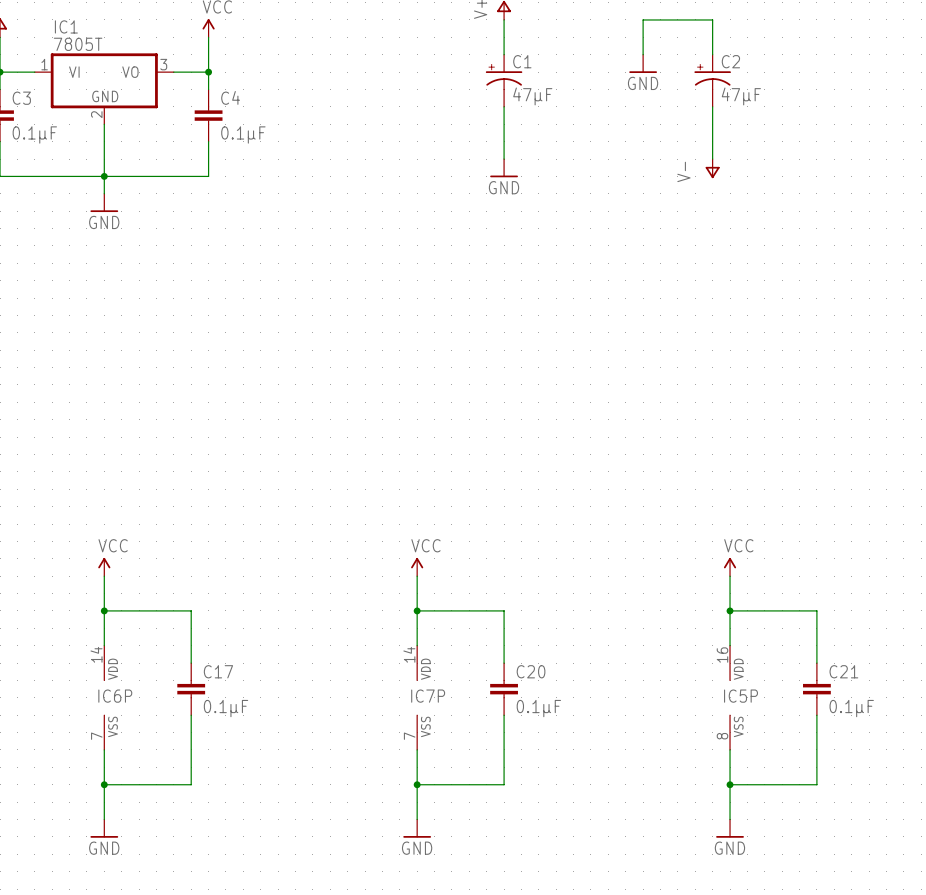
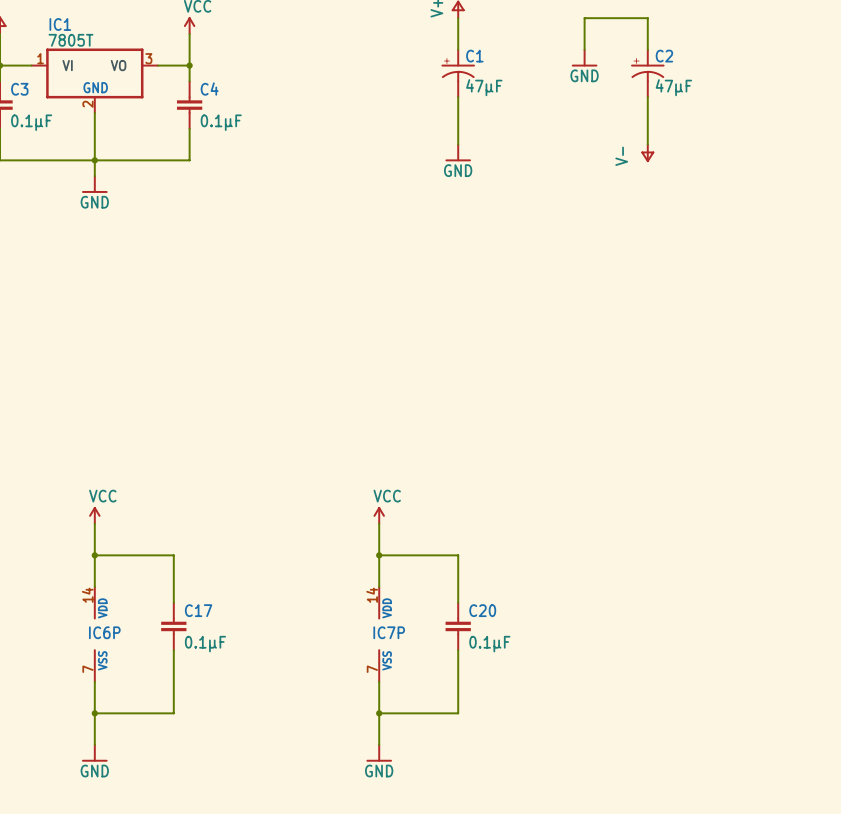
power symbol: VCC (730, 567) -> none
wire: (730, 576) (730, 645) -> none
wire: (730, 610) (816, 610) (816, 663) -> none
junction: (730, 610) -> none
C21: 0.1µF (816, 689) -> none
IC5P: (730, 697) -> none
wire: (816, 715) (816, 784) (730, 784) -> none
wire: (730, 749) (730, 819) -> none
junction: (730, 784) -> none
power symbol: GND (730, 828) -> none

